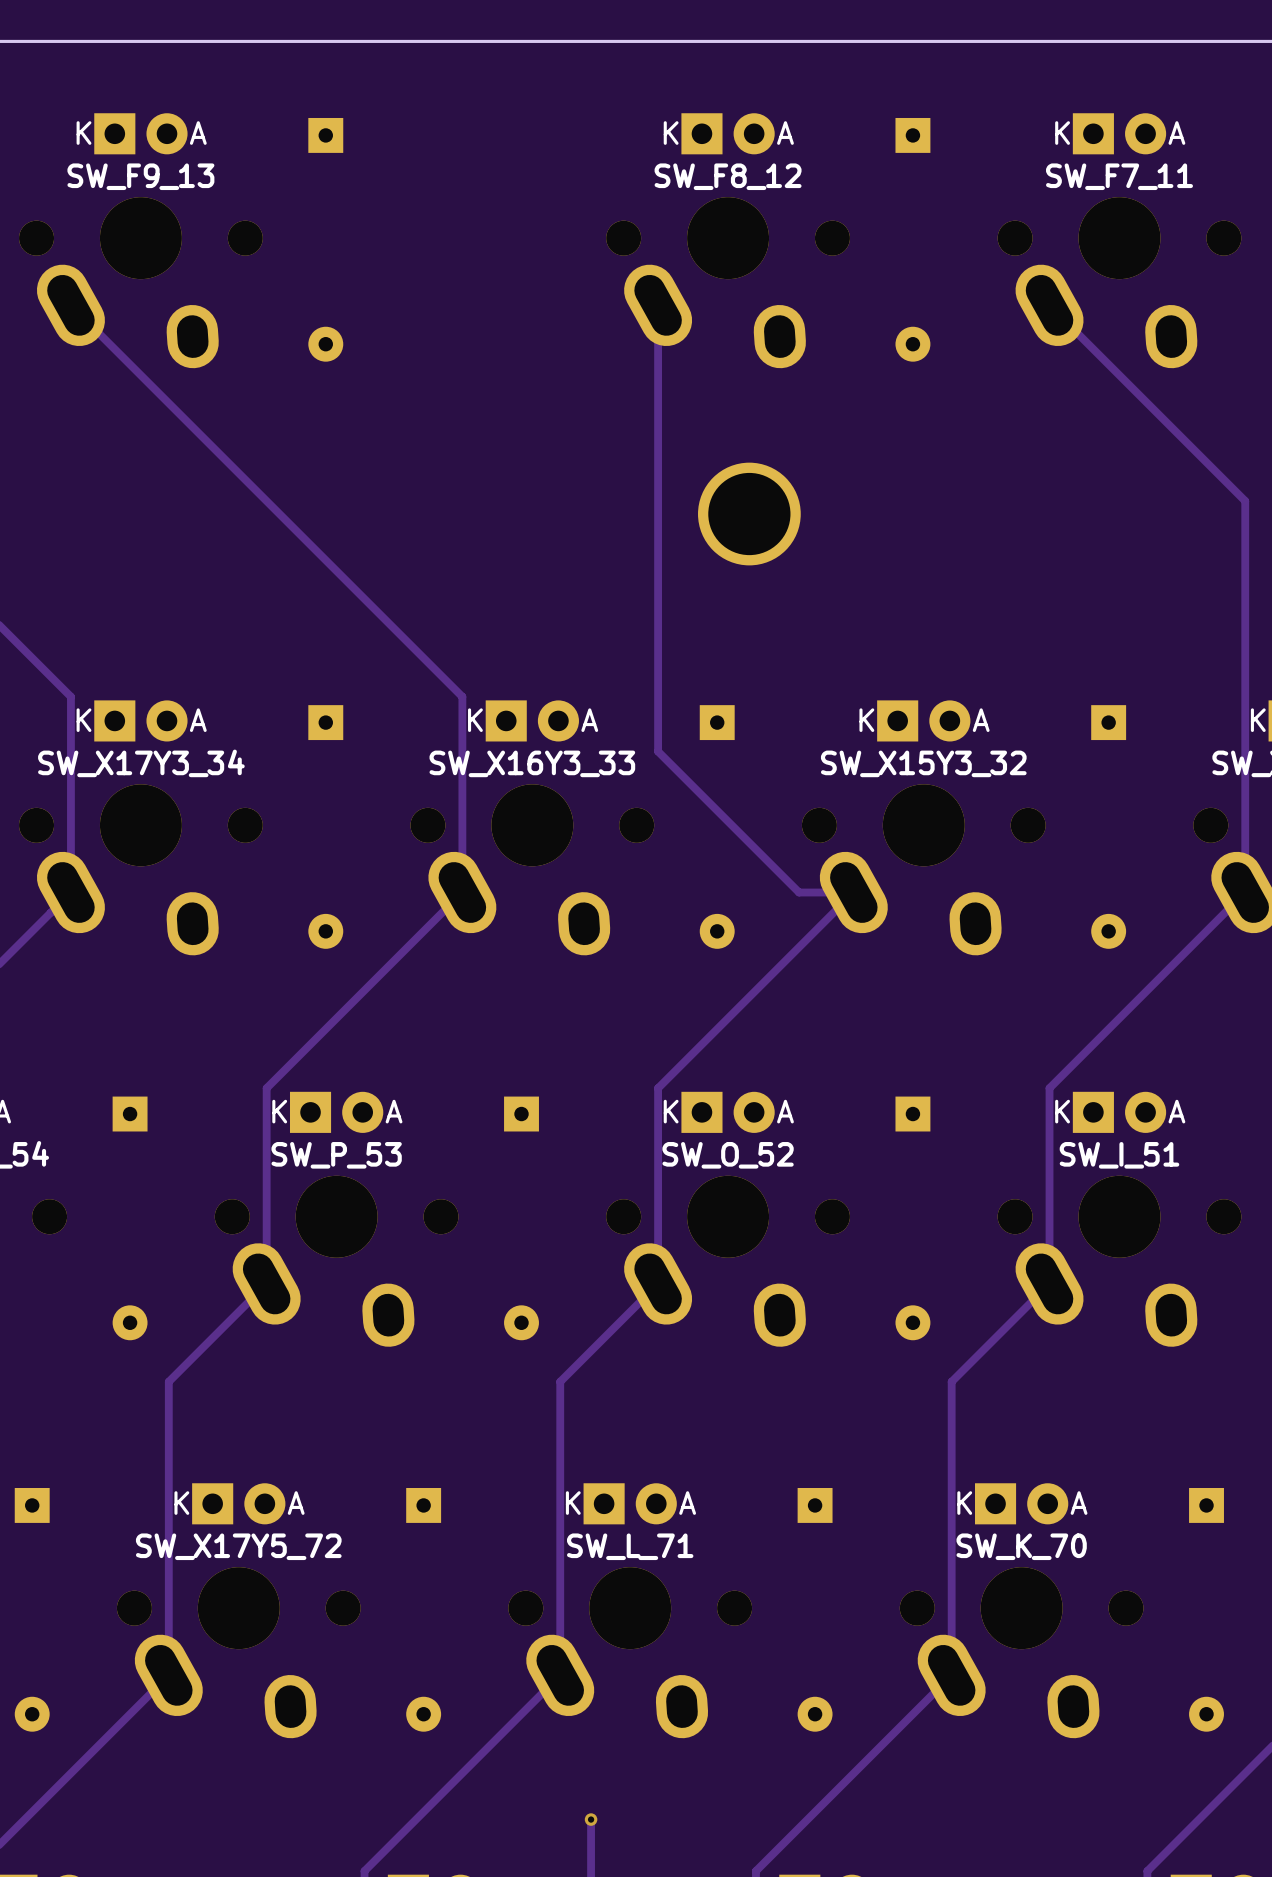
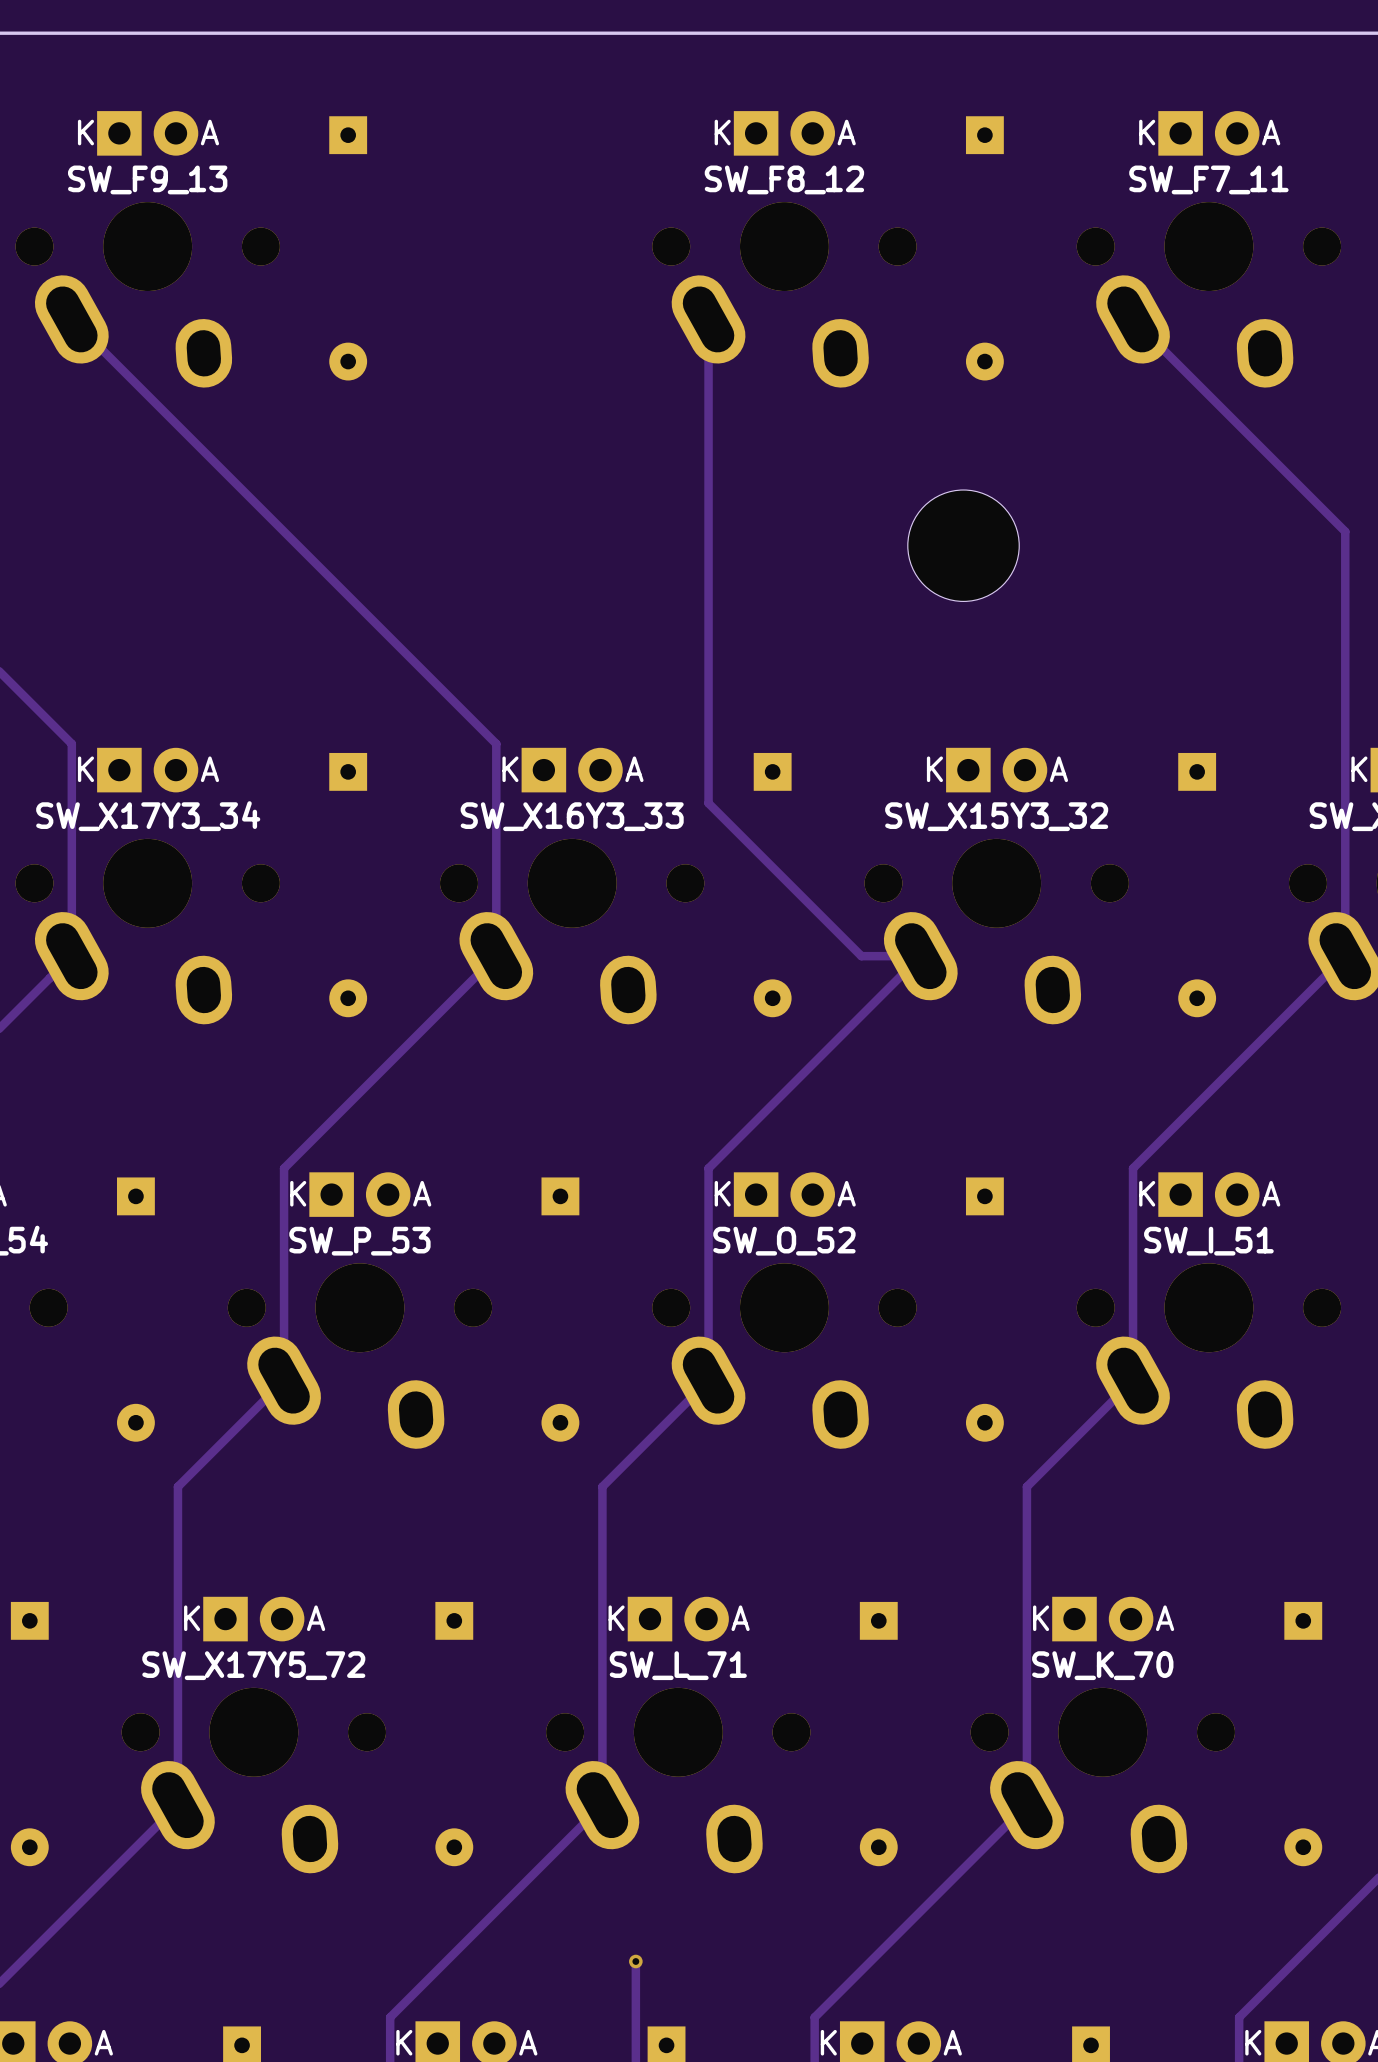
part: (749, 514) -> none
part: none -> (963, 545)

